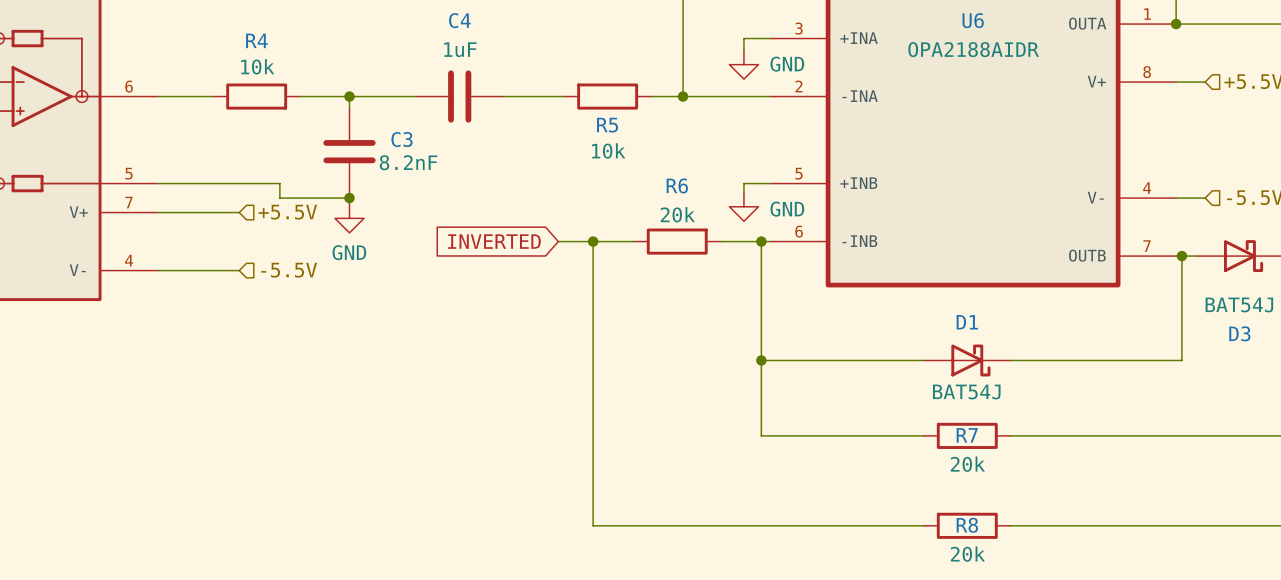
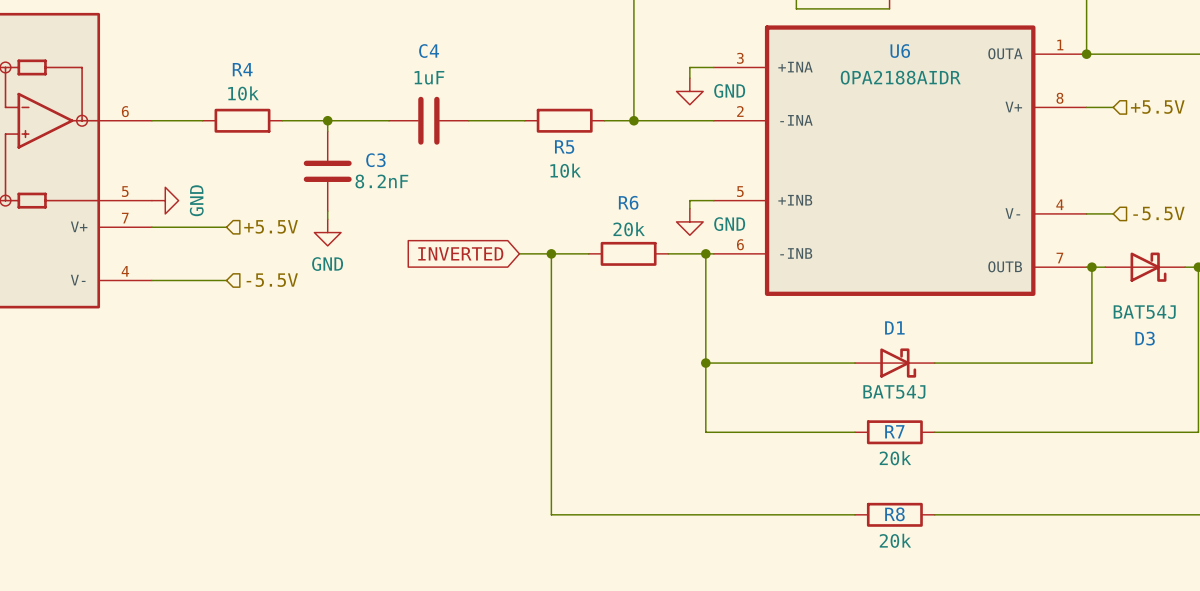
wire: (158, 183) (279, 183) (279, 198) (349, 198) -> none
power symbol: none -> GND (165, 200)
junction: (349, 198) -> none

